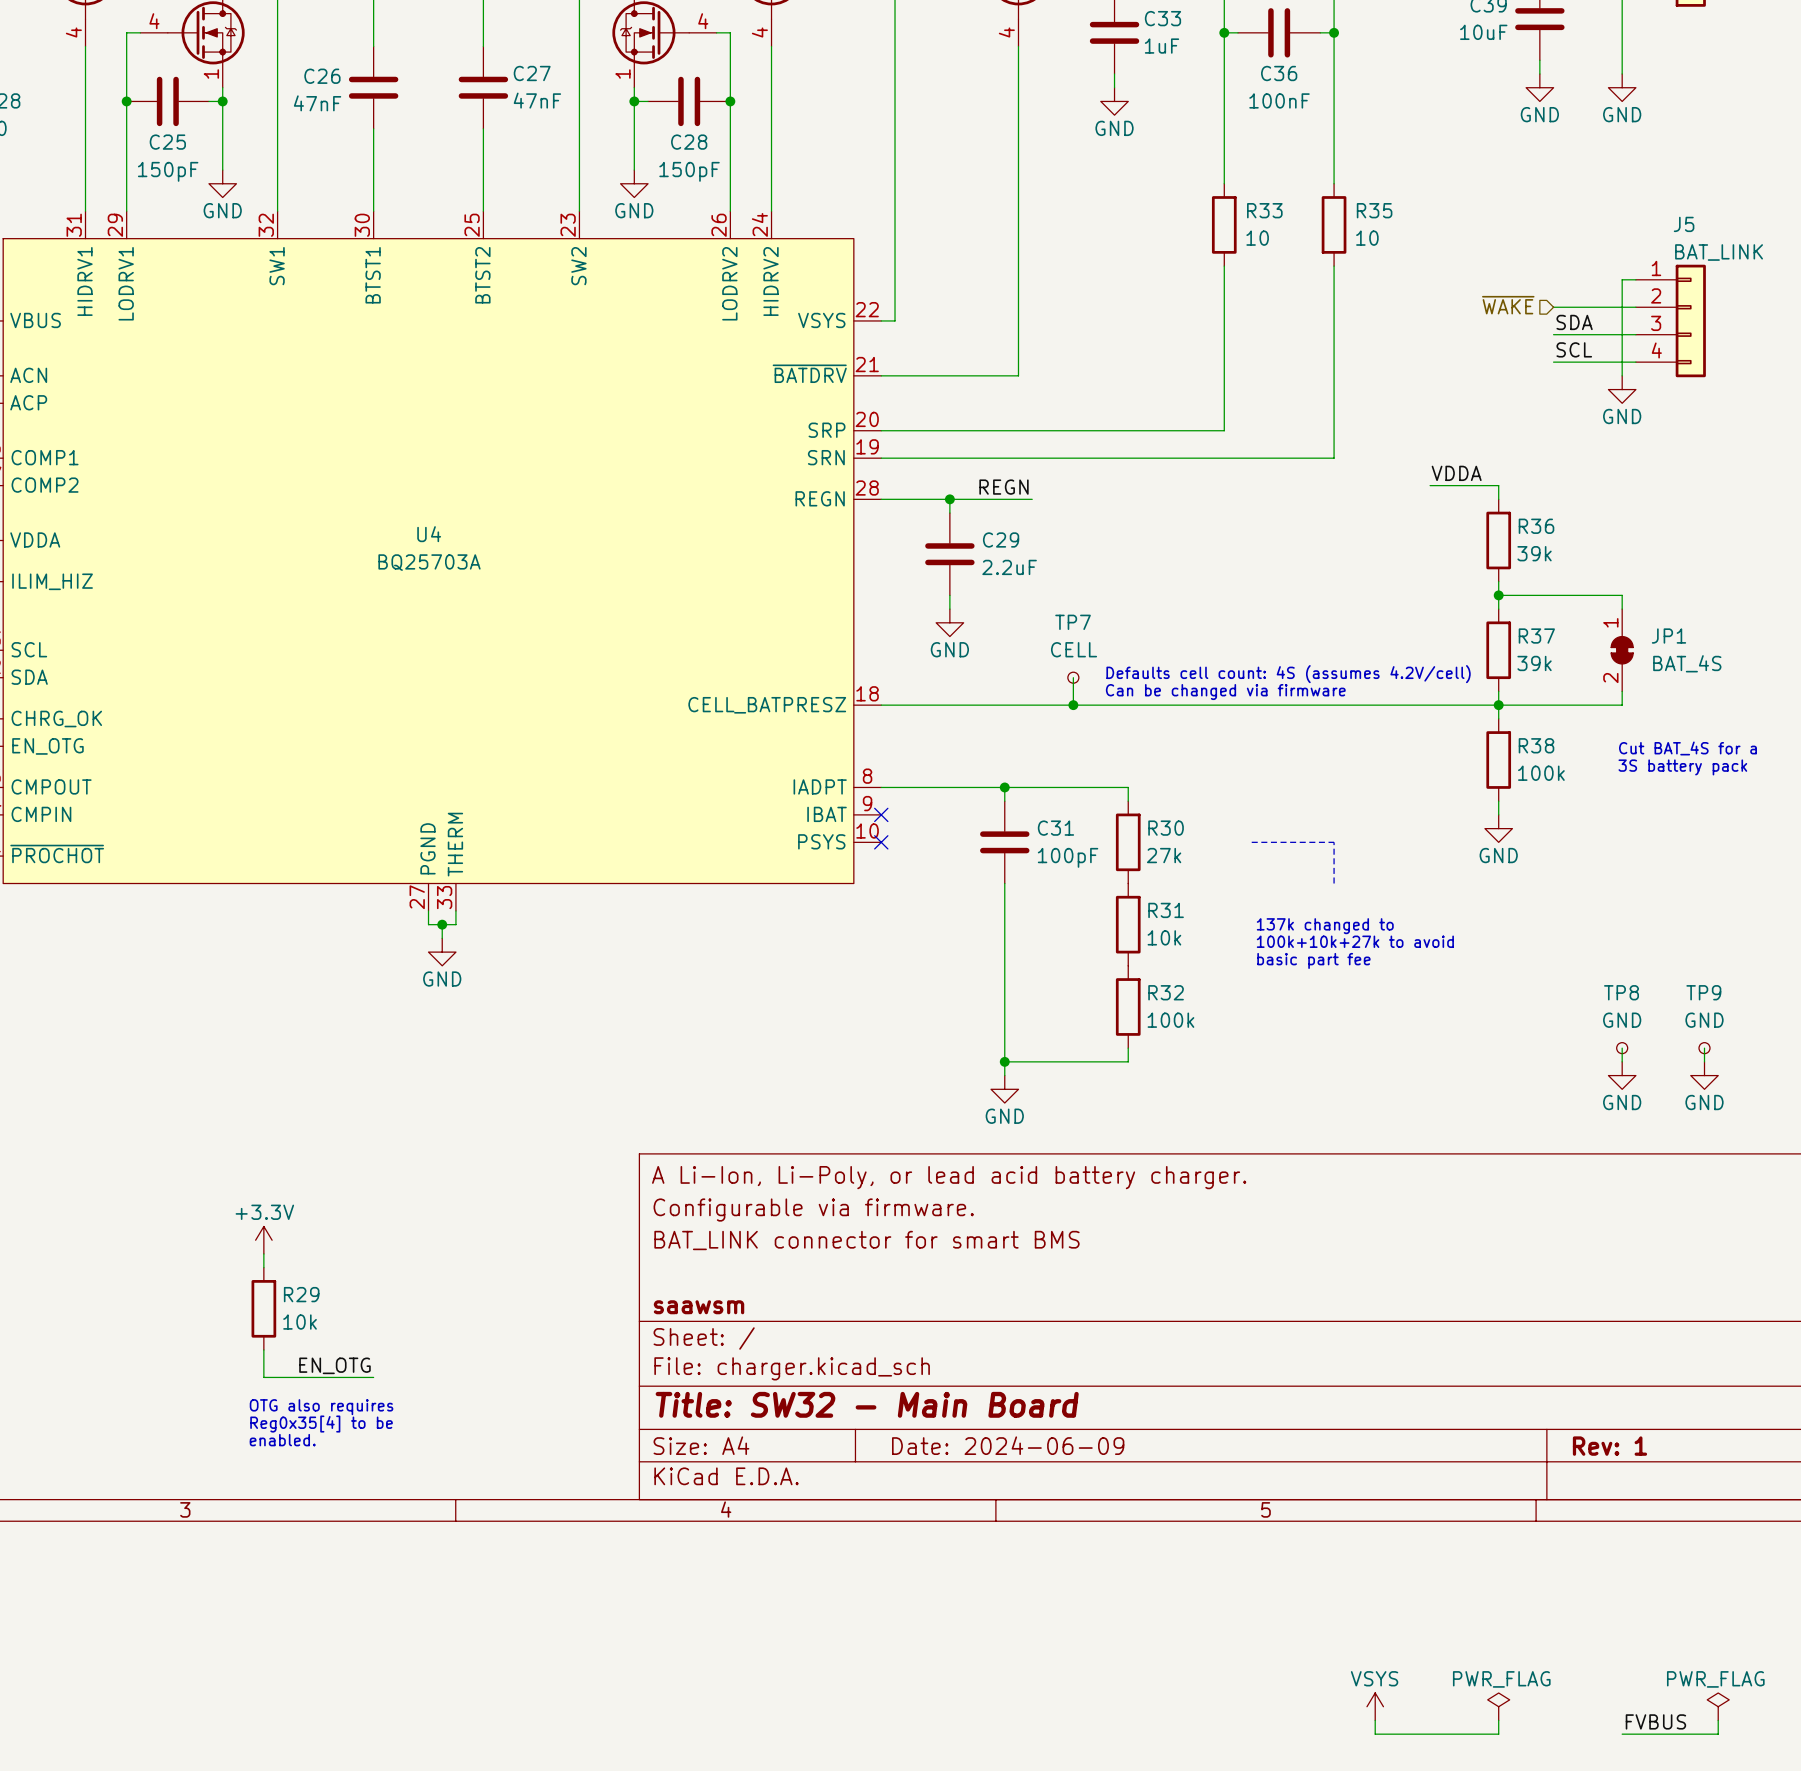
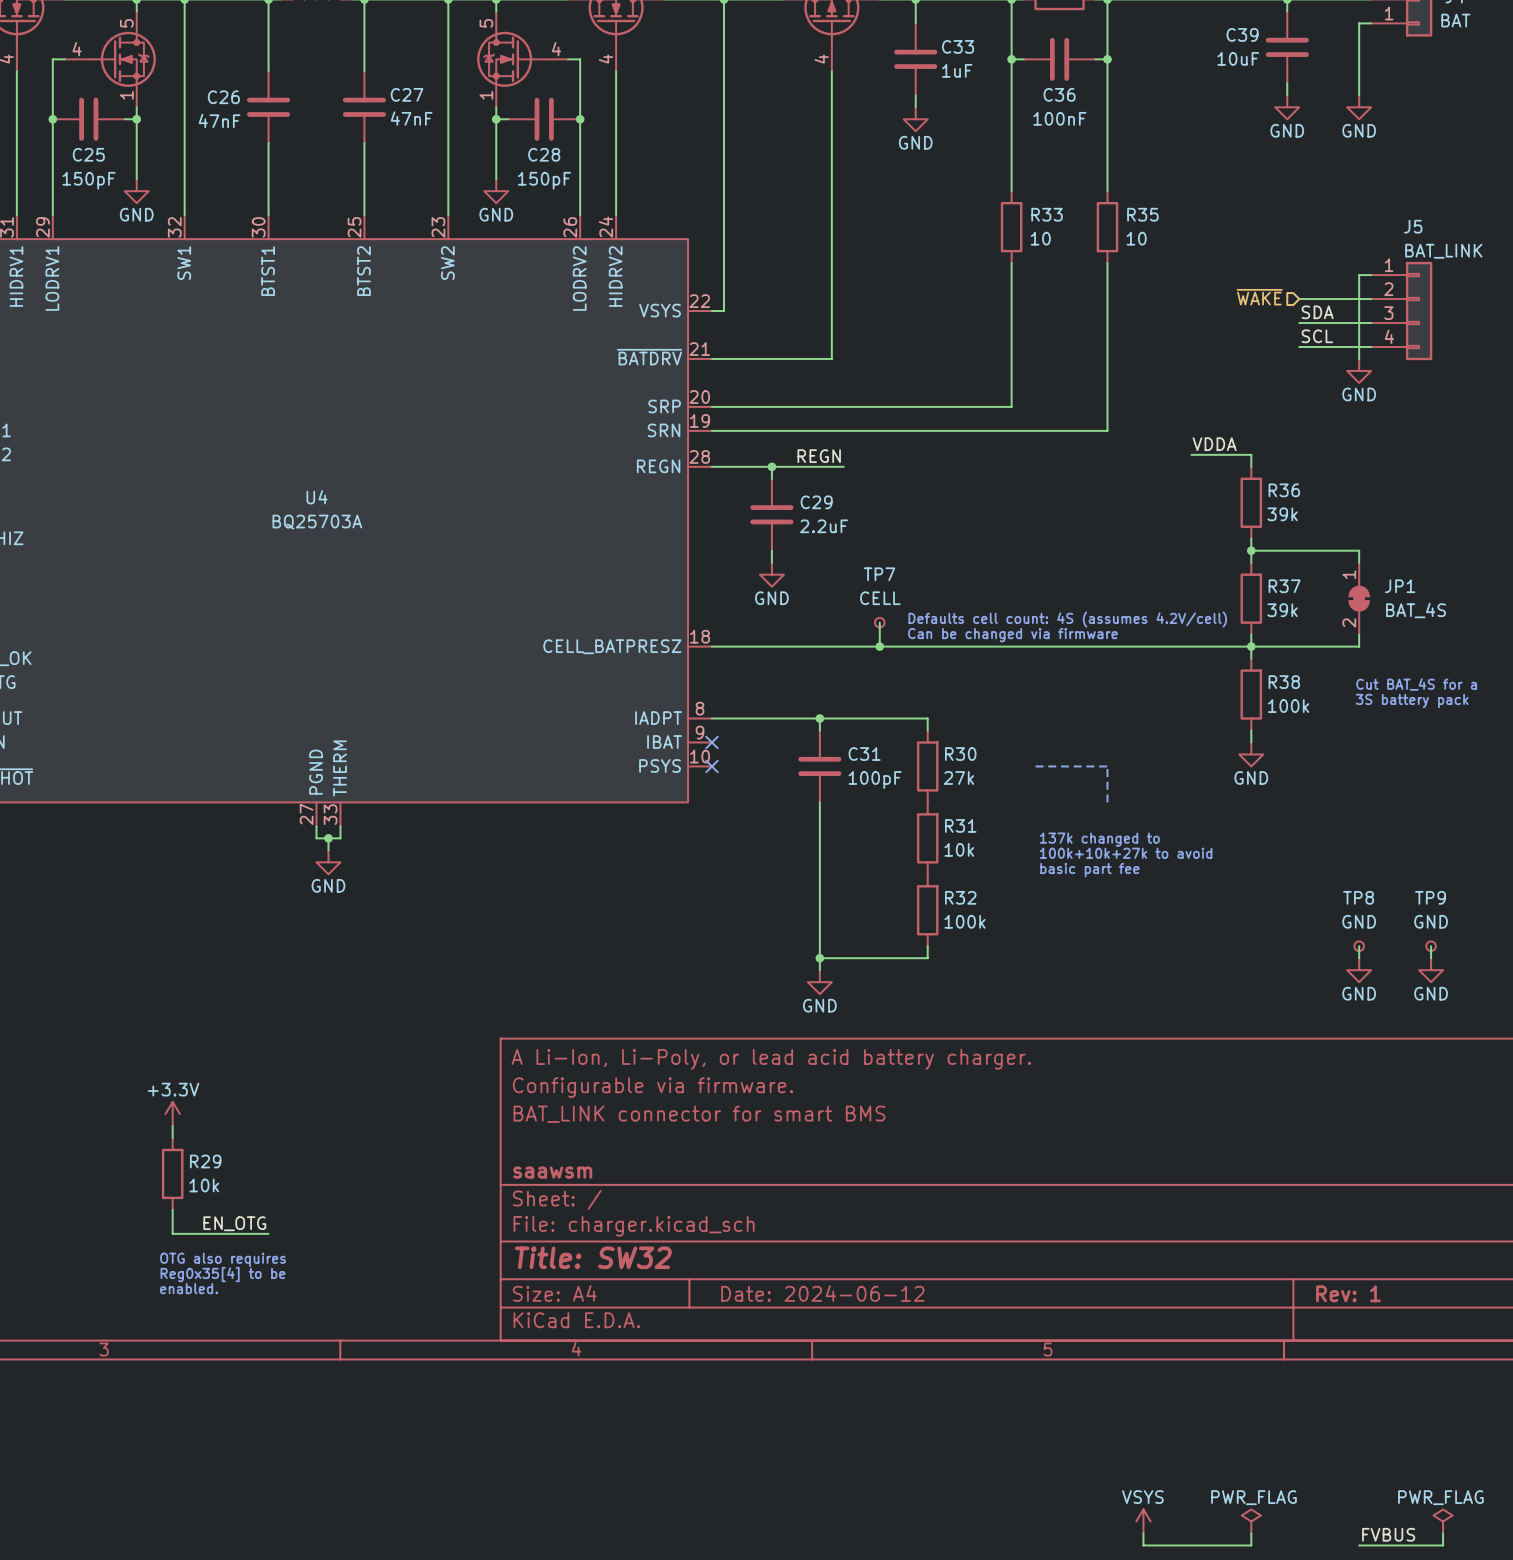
title block: Title: SW32 - Main Board (867, 1404) -> Title: SW32 (593, 1257)
title block: Date: 2024-06-09 (1008, 1445) -> Date: 2024-06-12 (822, 1293)

